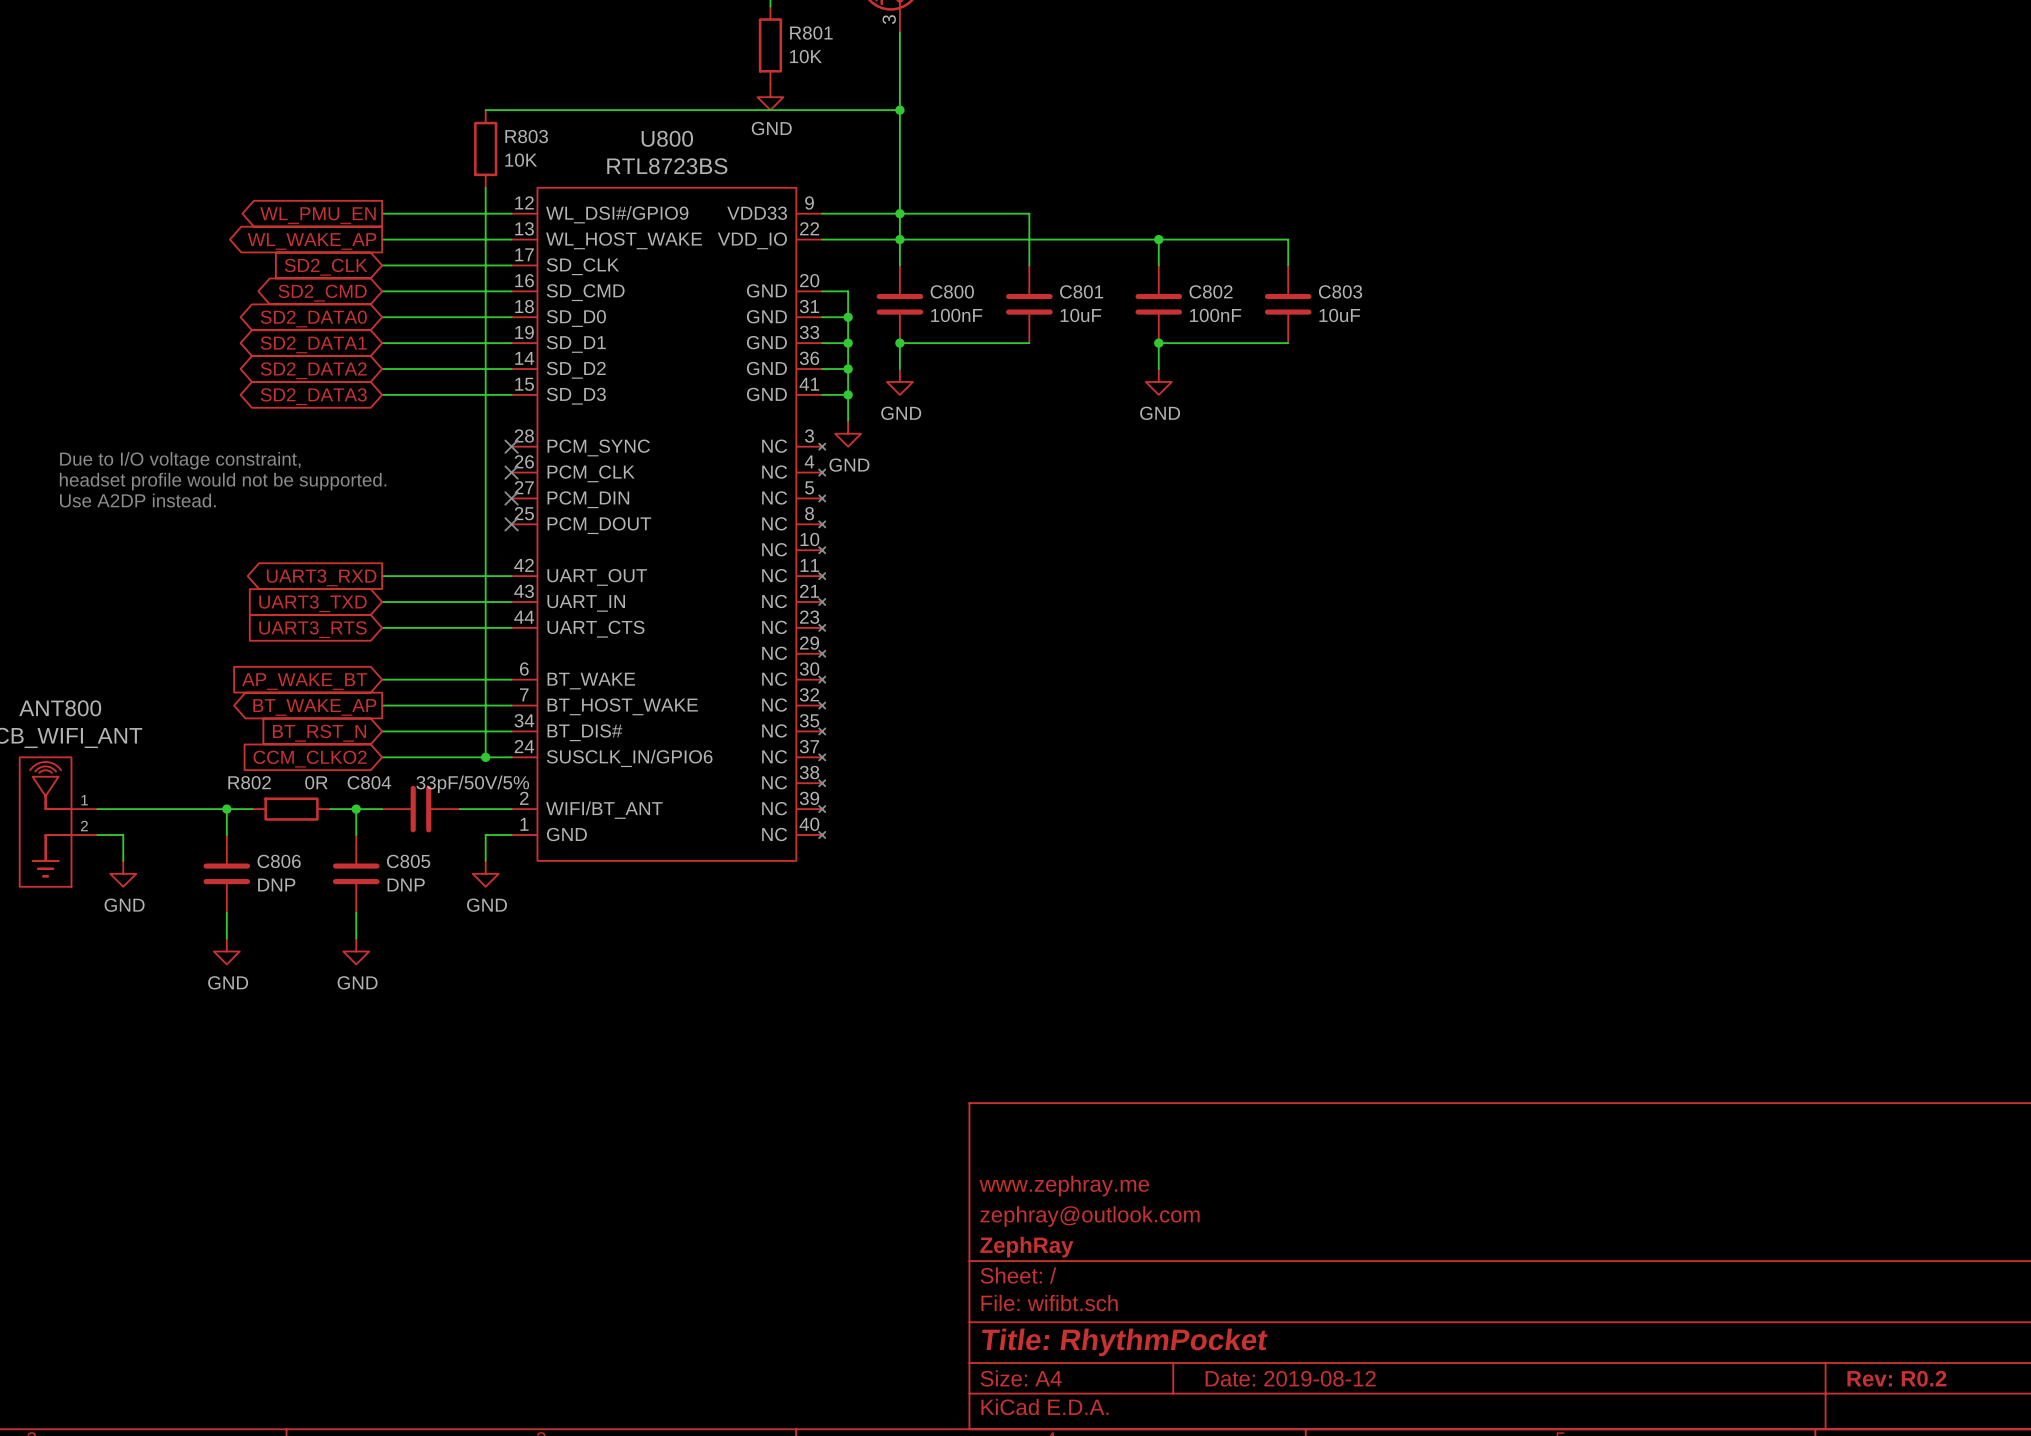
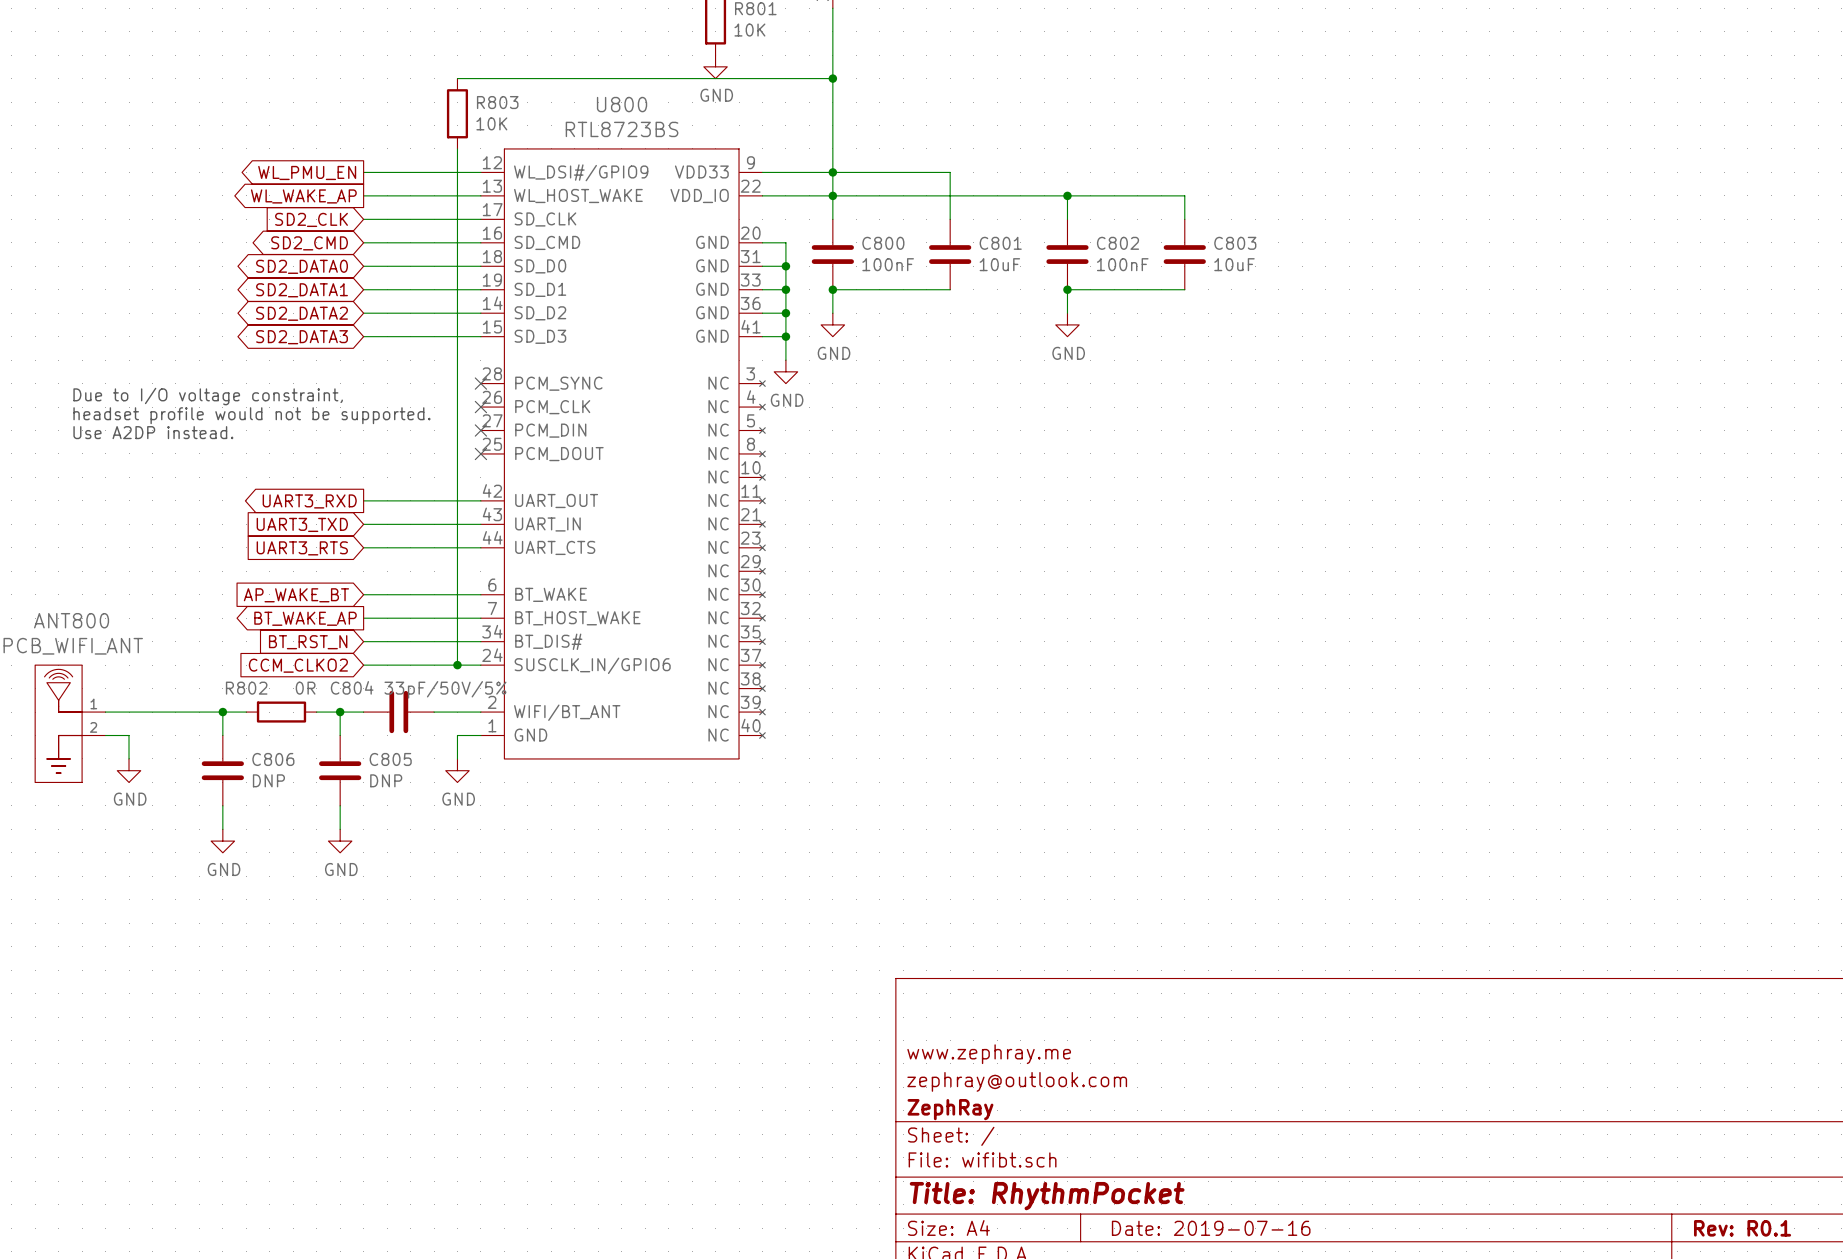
title block: Date: 2019-08-12 (1290, 1378) -> Date: 2019-07-16 (1211, 1228)
title block: Rev: R0.2 (1896, 1378) -> Rev: R0.1 (1742, 1228)

